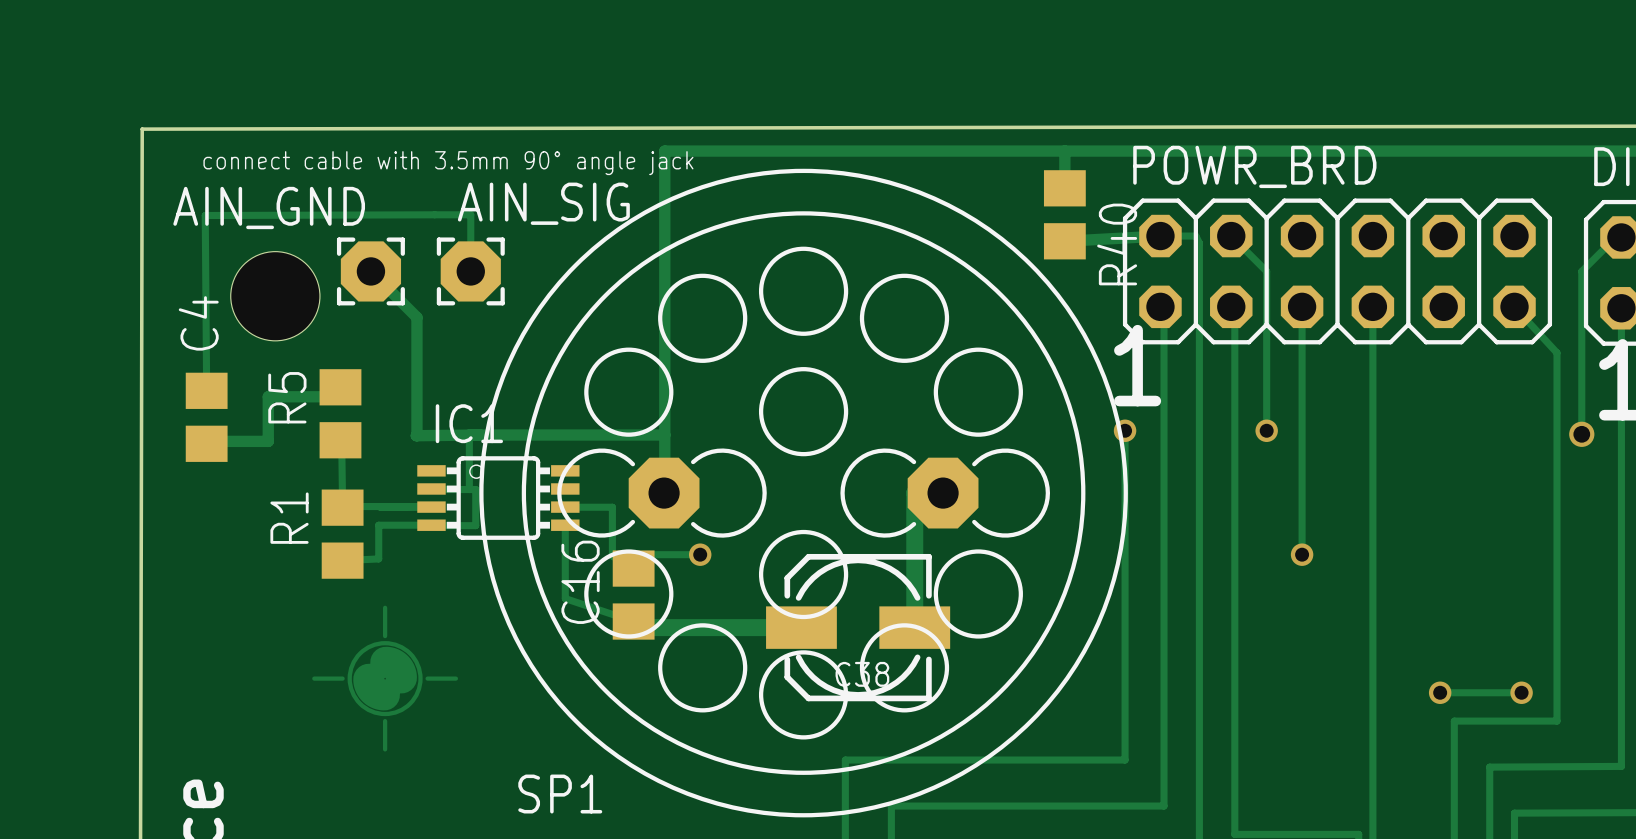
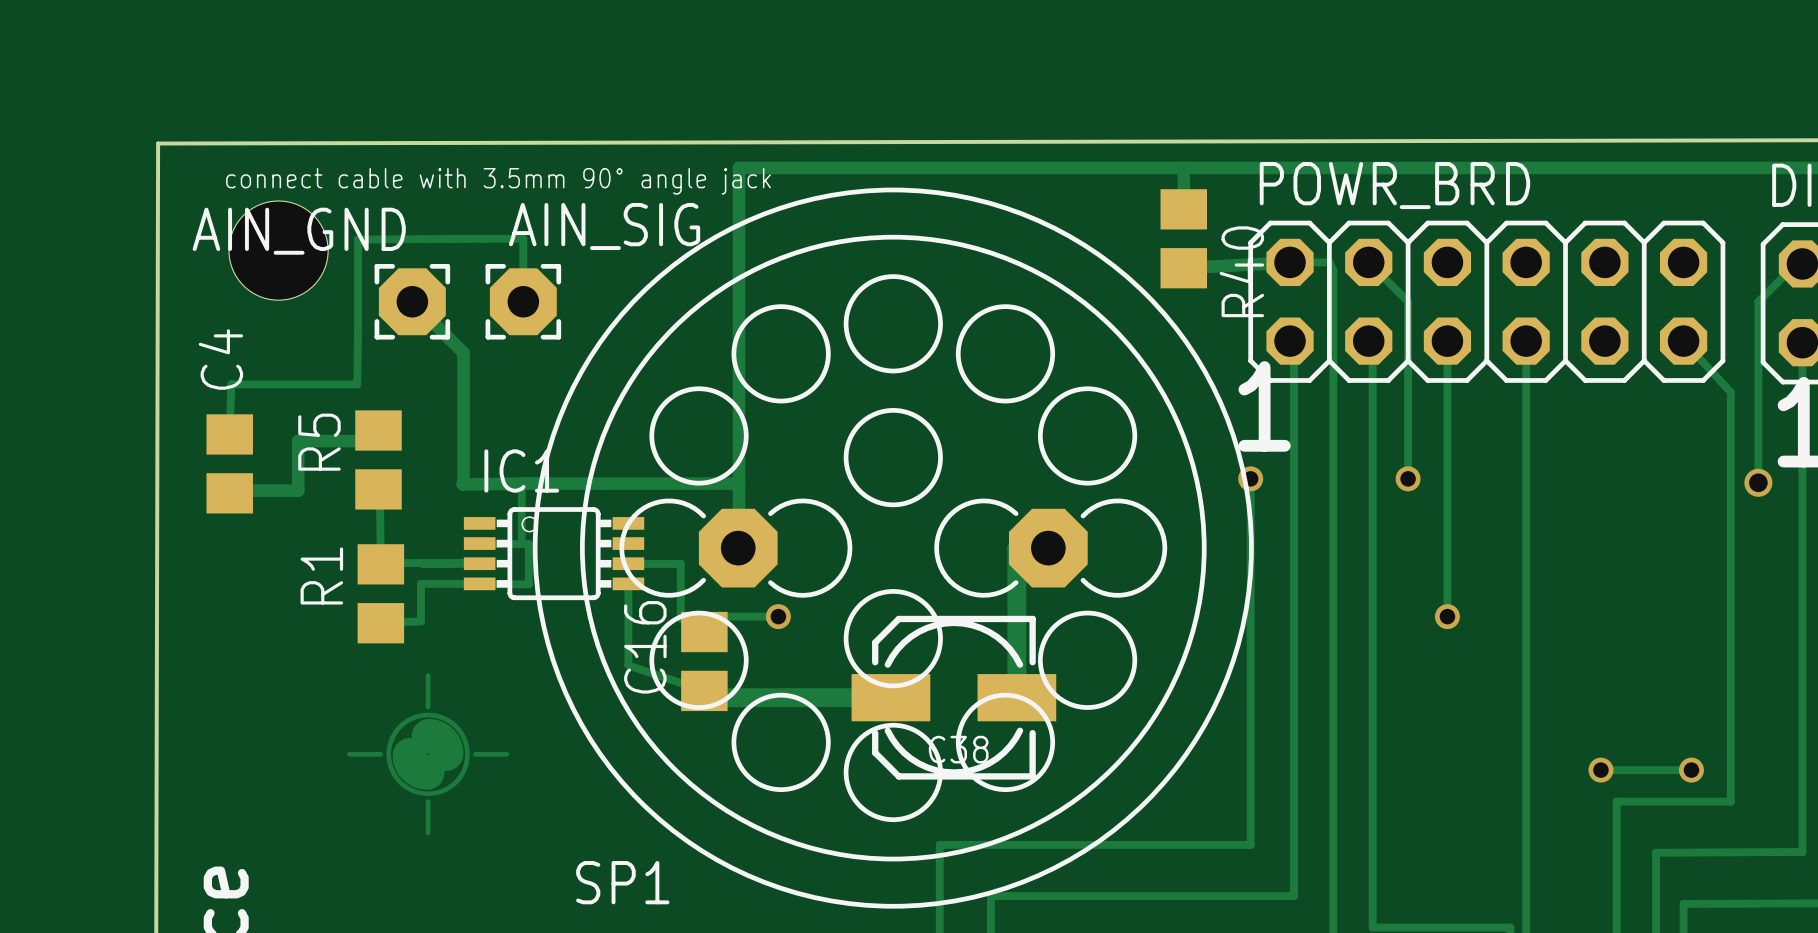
track: (434, 214) (205, 215) (206, 390) -> (483, 238) (358, 239) (357, 384) (231, 384) (229, 434)
hole position: (275, 296) -> (278, 250)

